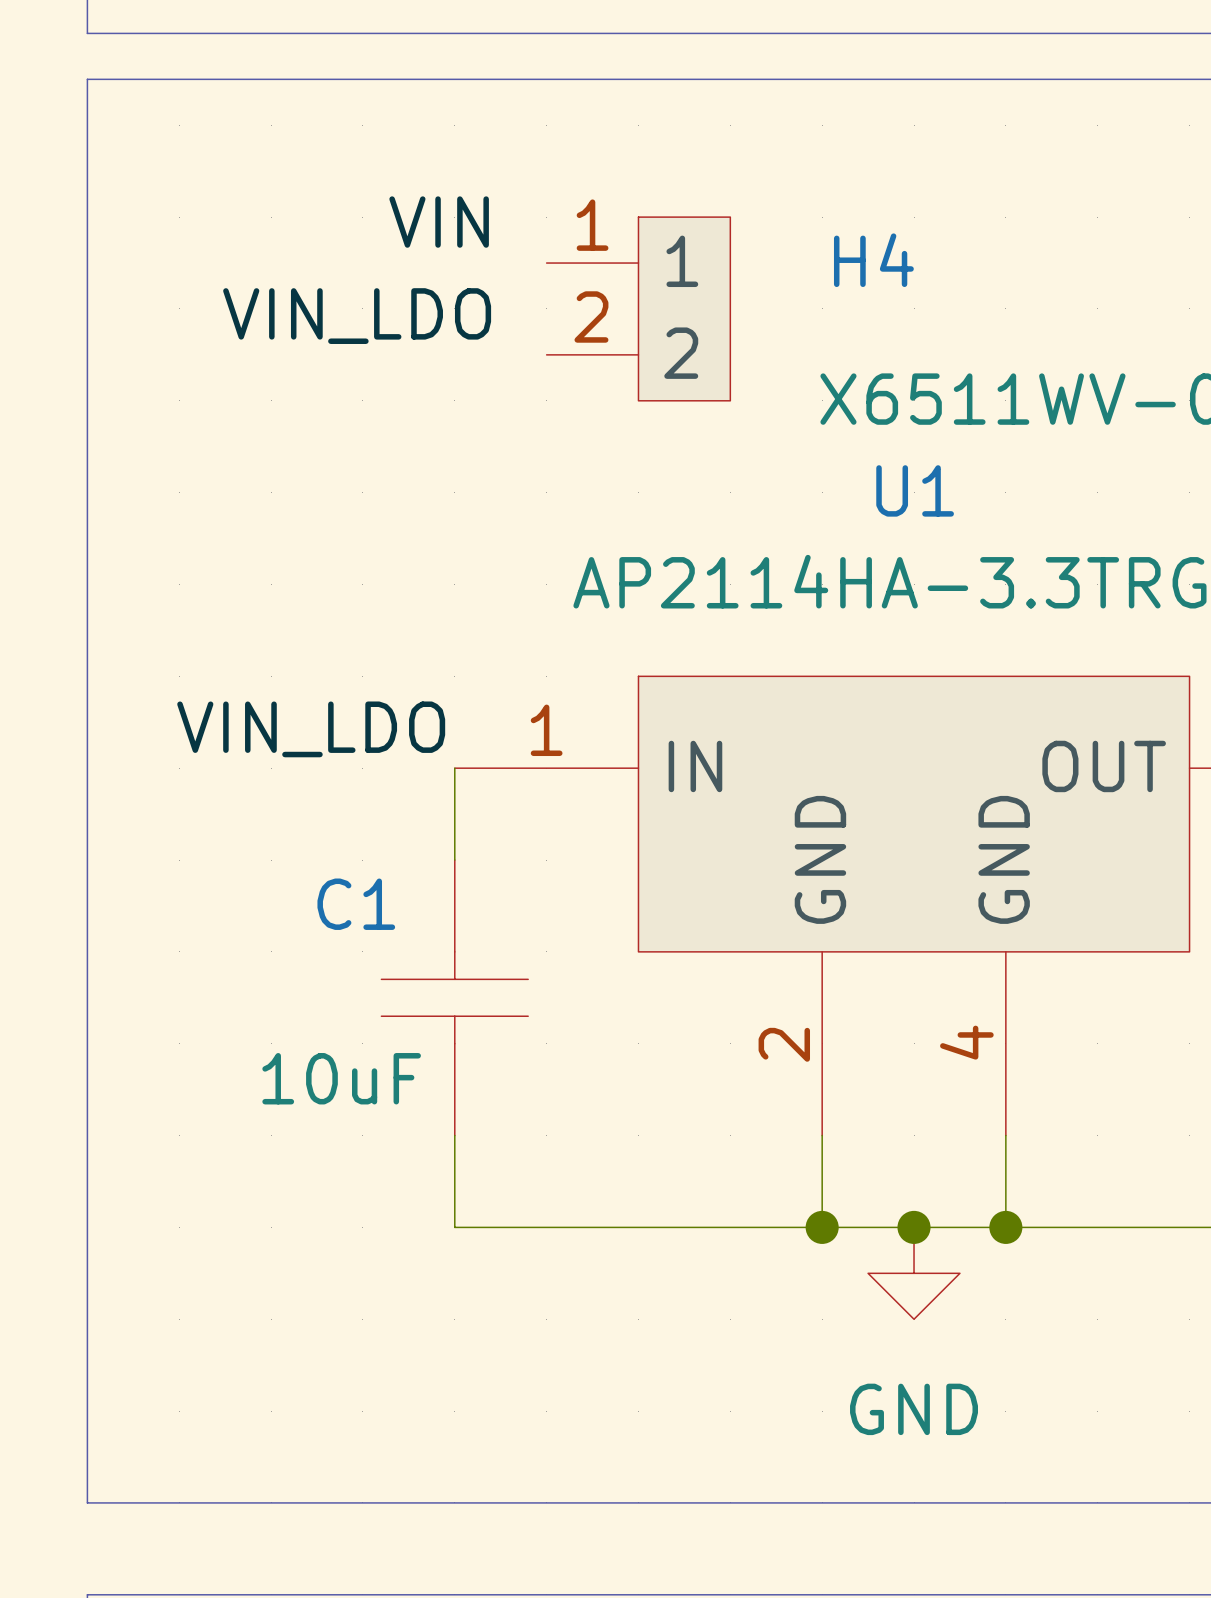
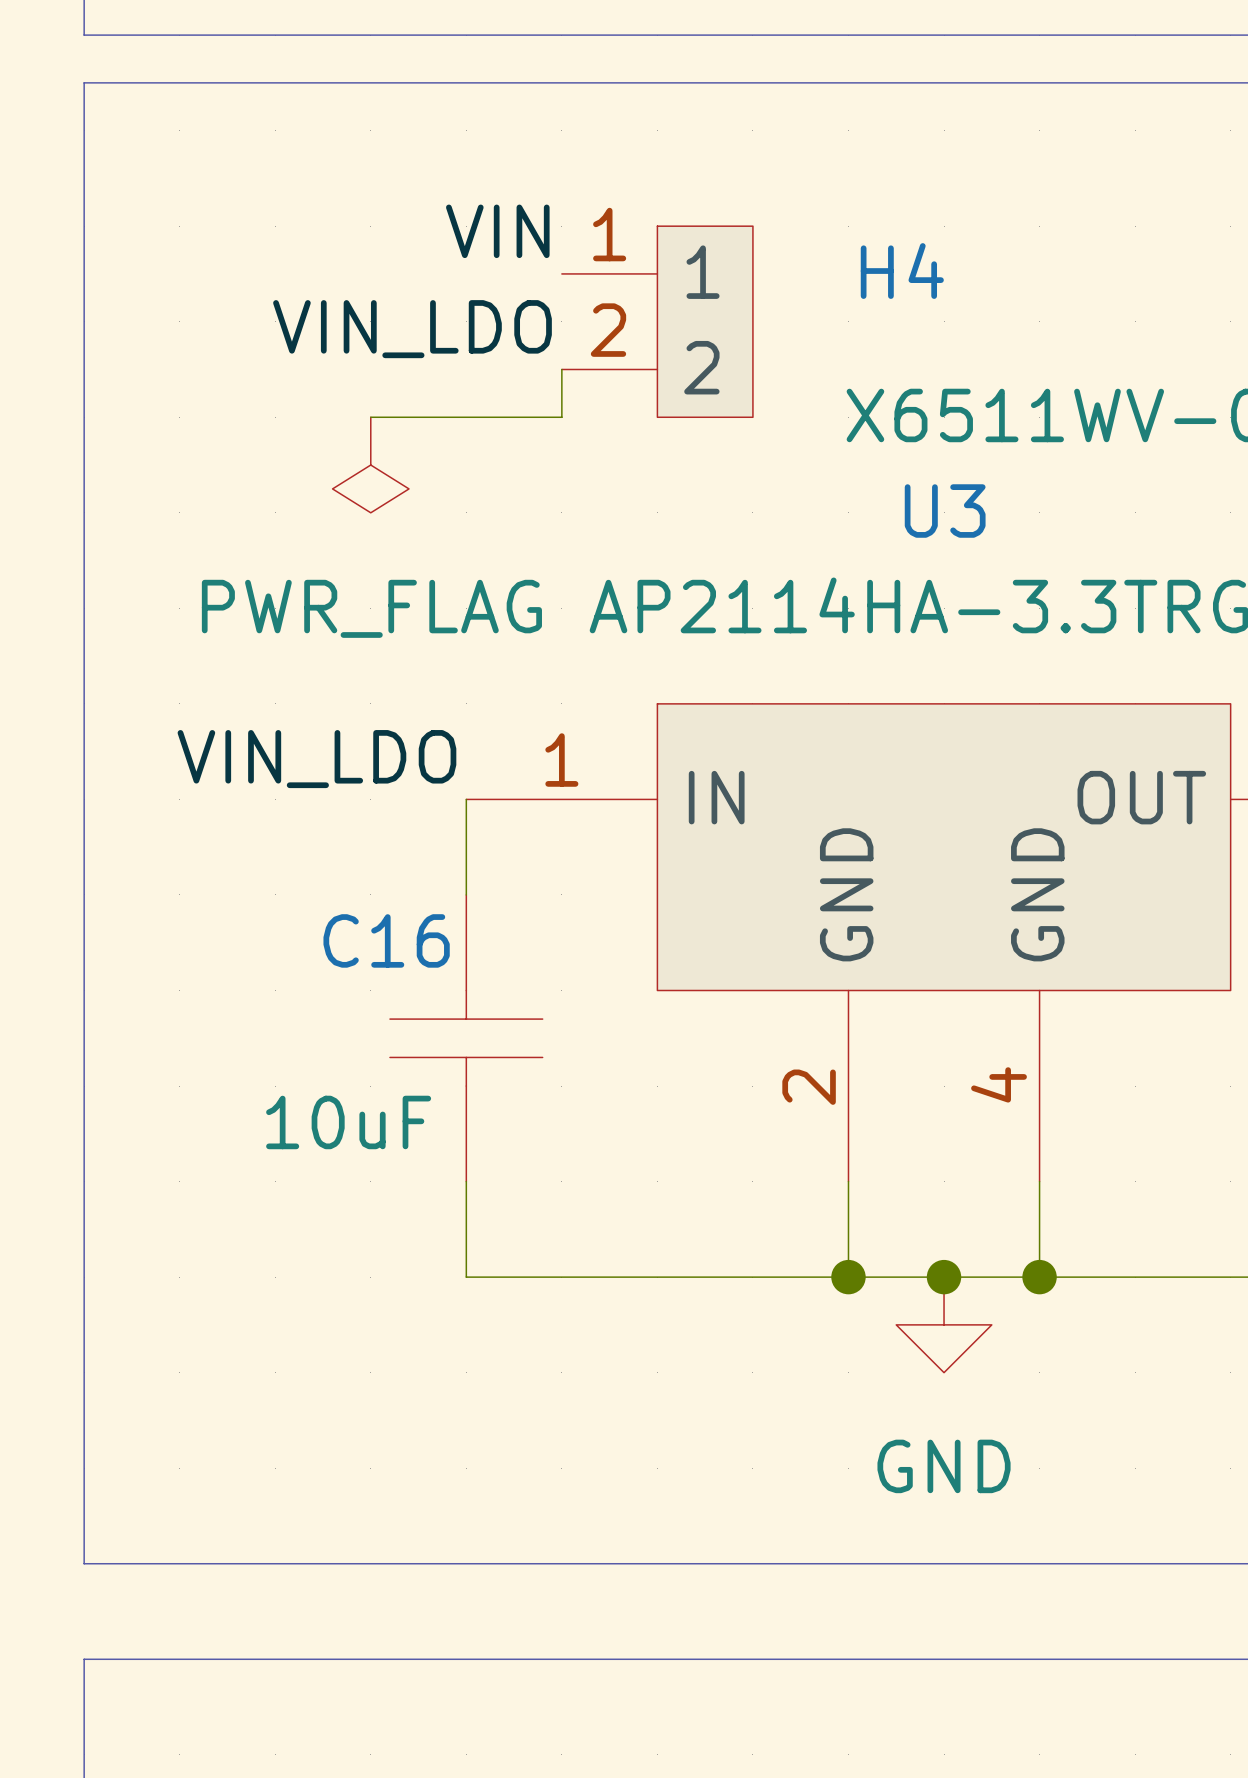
label position: VIN (439, 222) -> VIN (497, 231)
label position: VIN_LDO (357, 316) -> VIN_LDO (412, 329)
wire: none -> (561, 369) (561, 417) (370, 417)
power symbol: none -> PWR_FLAG (370, 465)
U1 name: U1 (915, 490) -> U3 (945, 511)
C1 name: C1 (356, 904) -> C16 (386, 940)

